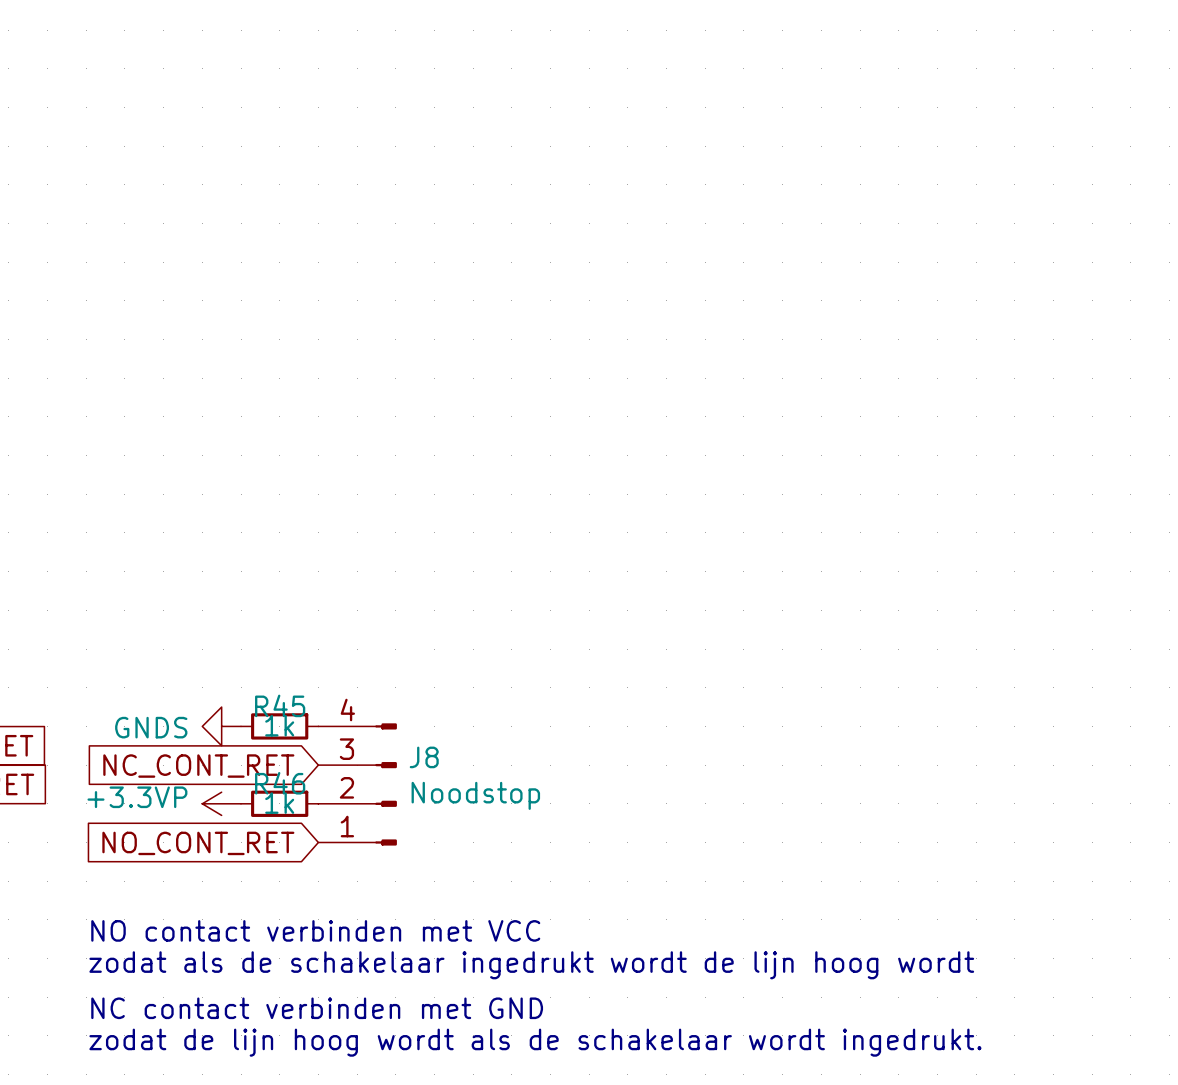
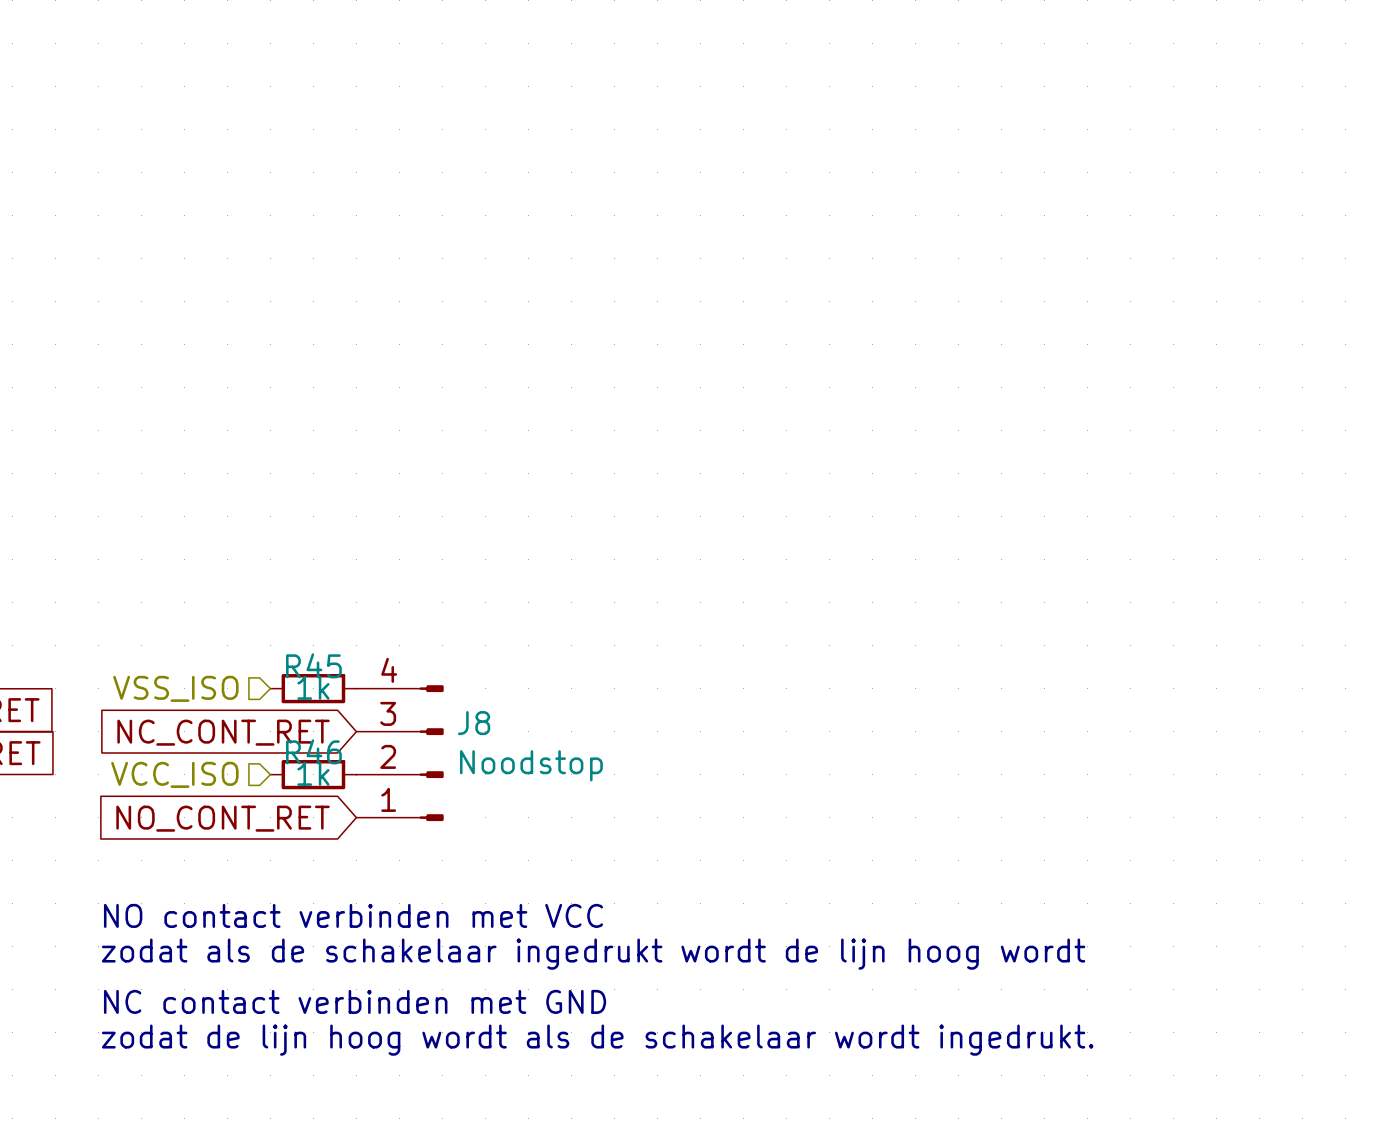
hierarchical label: none -> VSS_ISO (175, 688)
power symbol: GNDS (221, 726) -> none
power symbol: +3.3VP (221, 803) -> none
hierarchical label: none -> VCC_ISO (174, 774)

